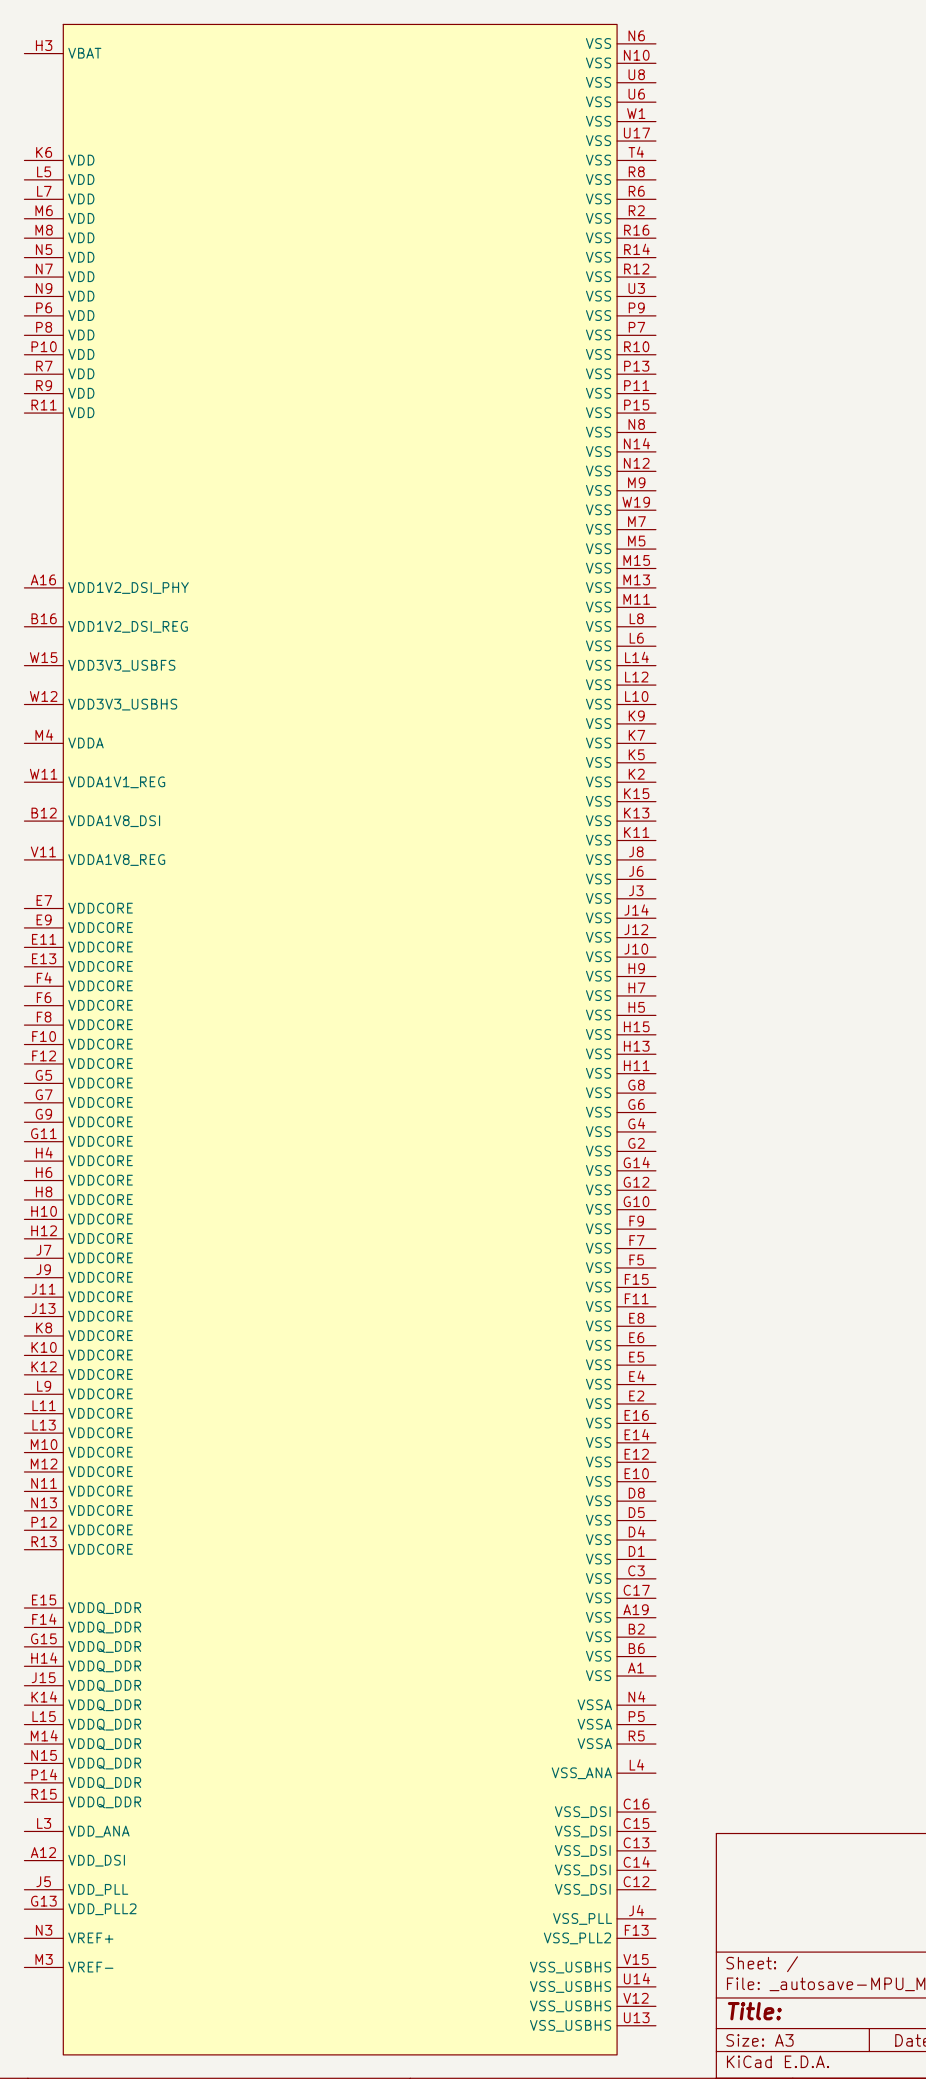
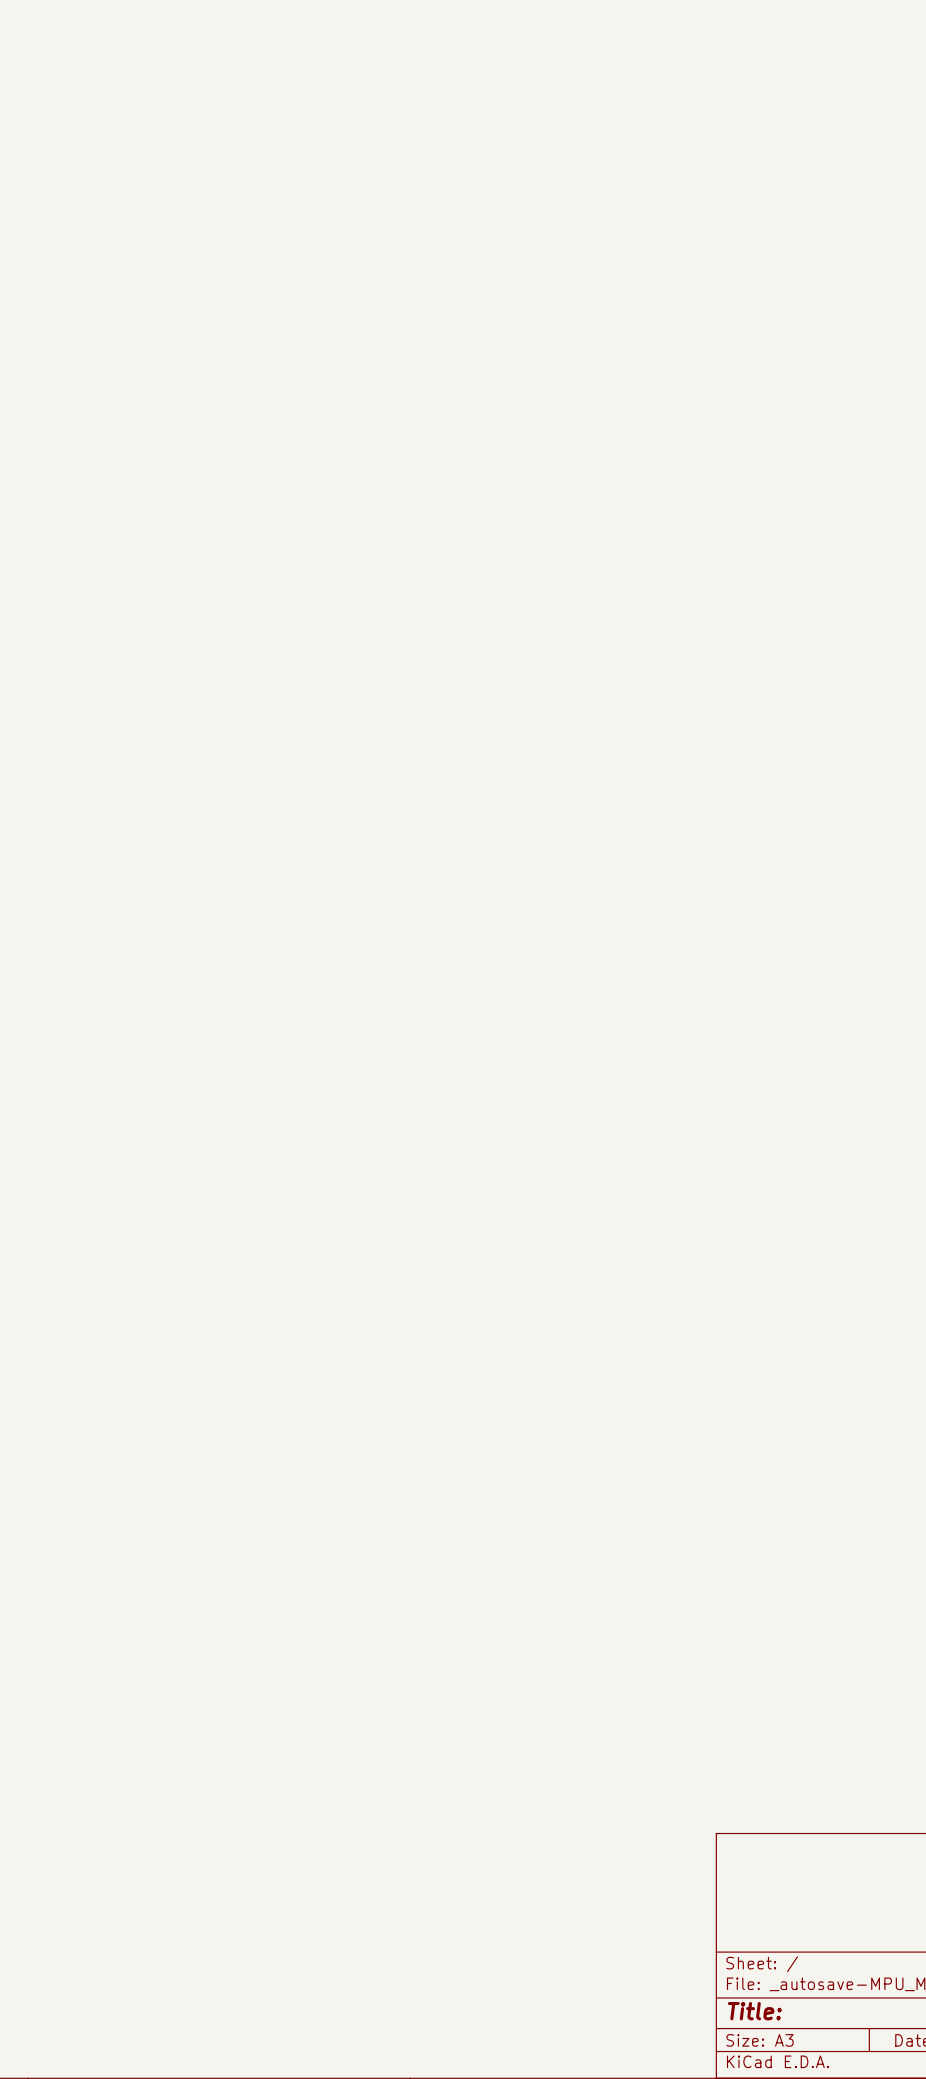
part: (340, 1039) -> none

